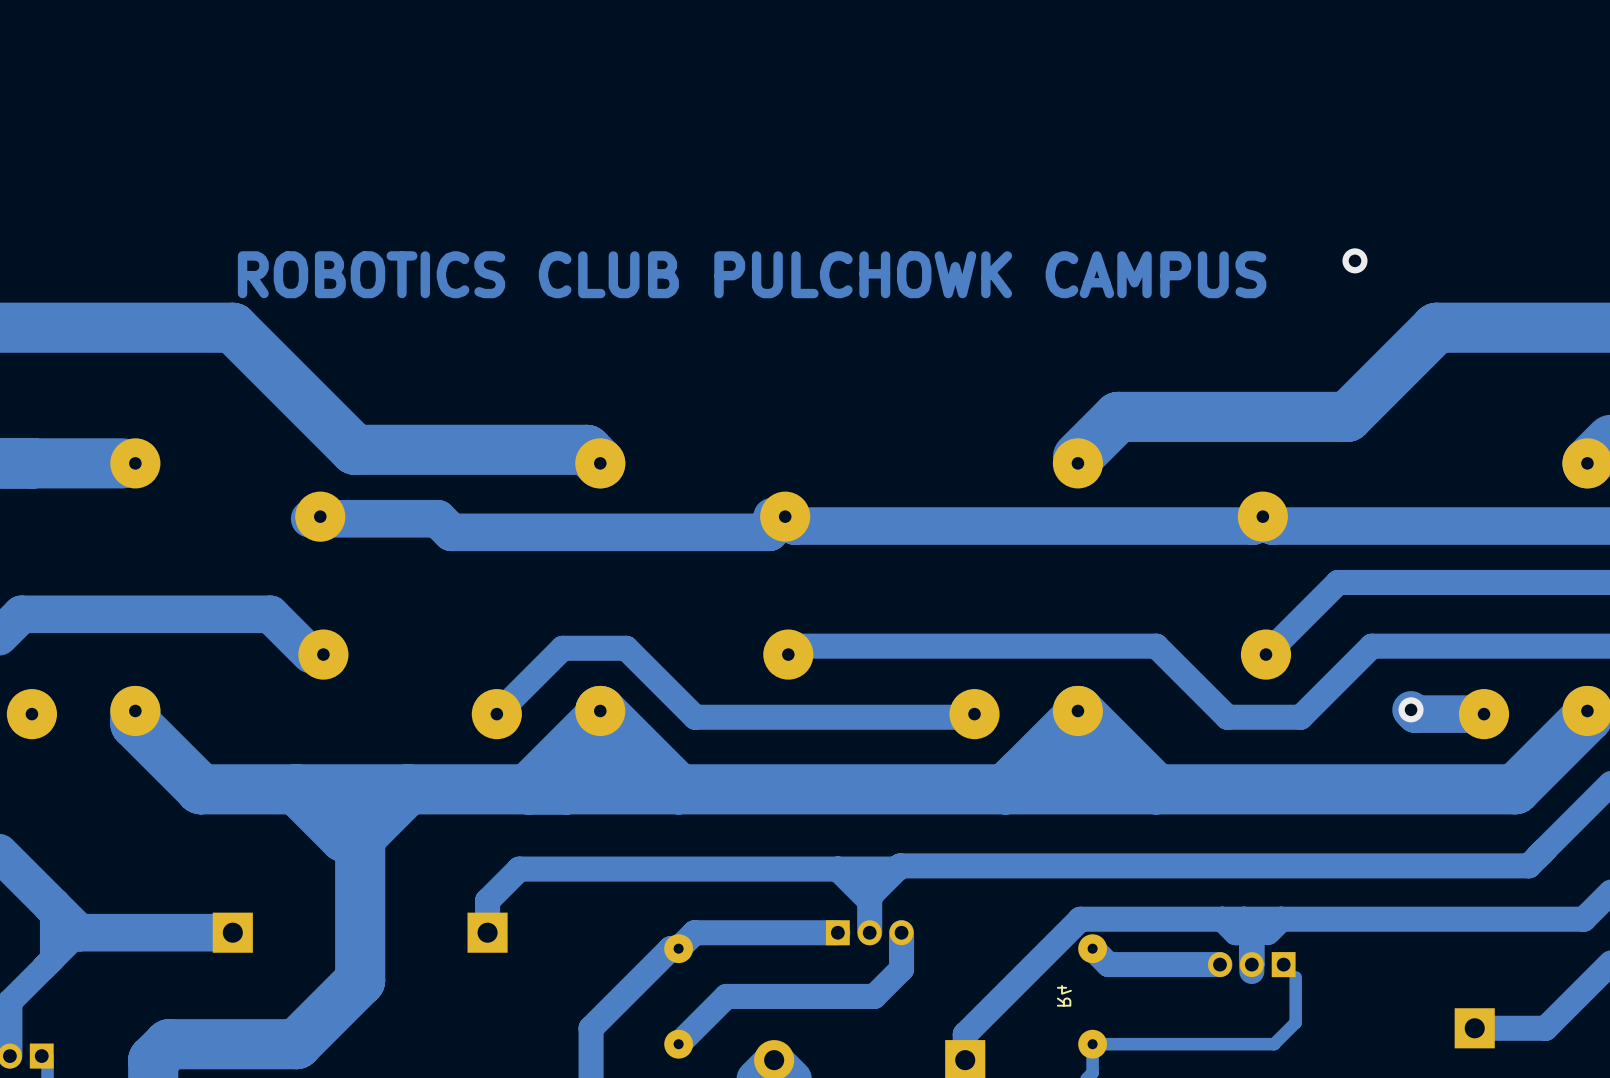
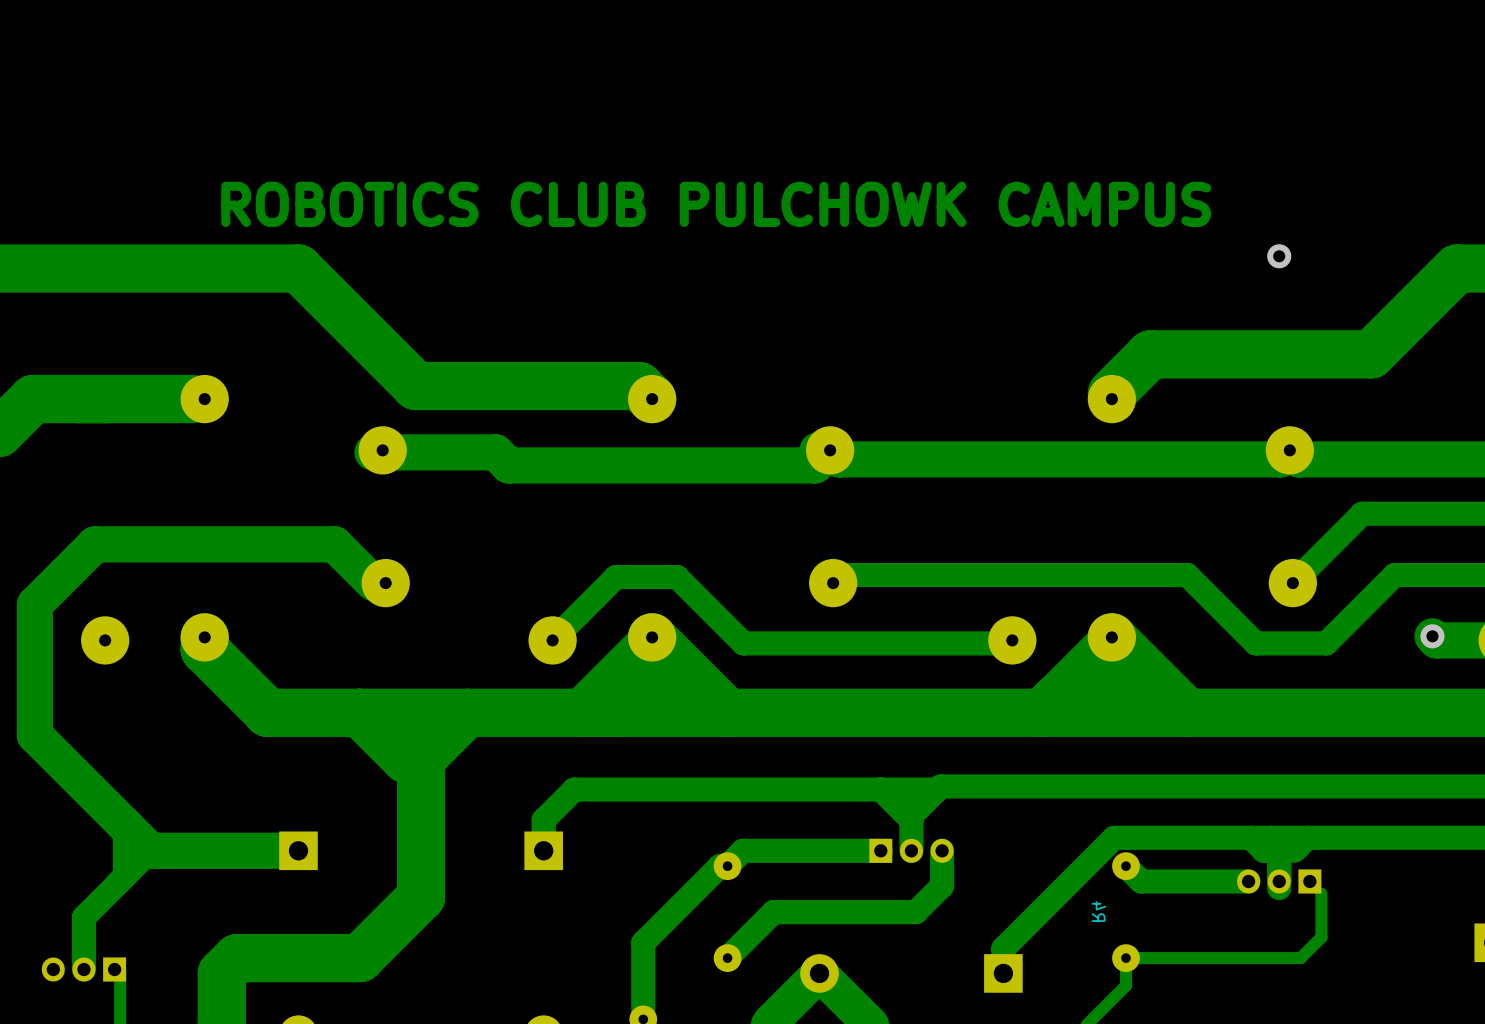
via: (1354, 260) -> none
text position: ROBOTICS CLUB PULCHOWK CAMPUS (752, 274) -> ROBOTICS CLUB PULCHOWK CAMPUS (716, 204)
via: none -> (1279, 256)

